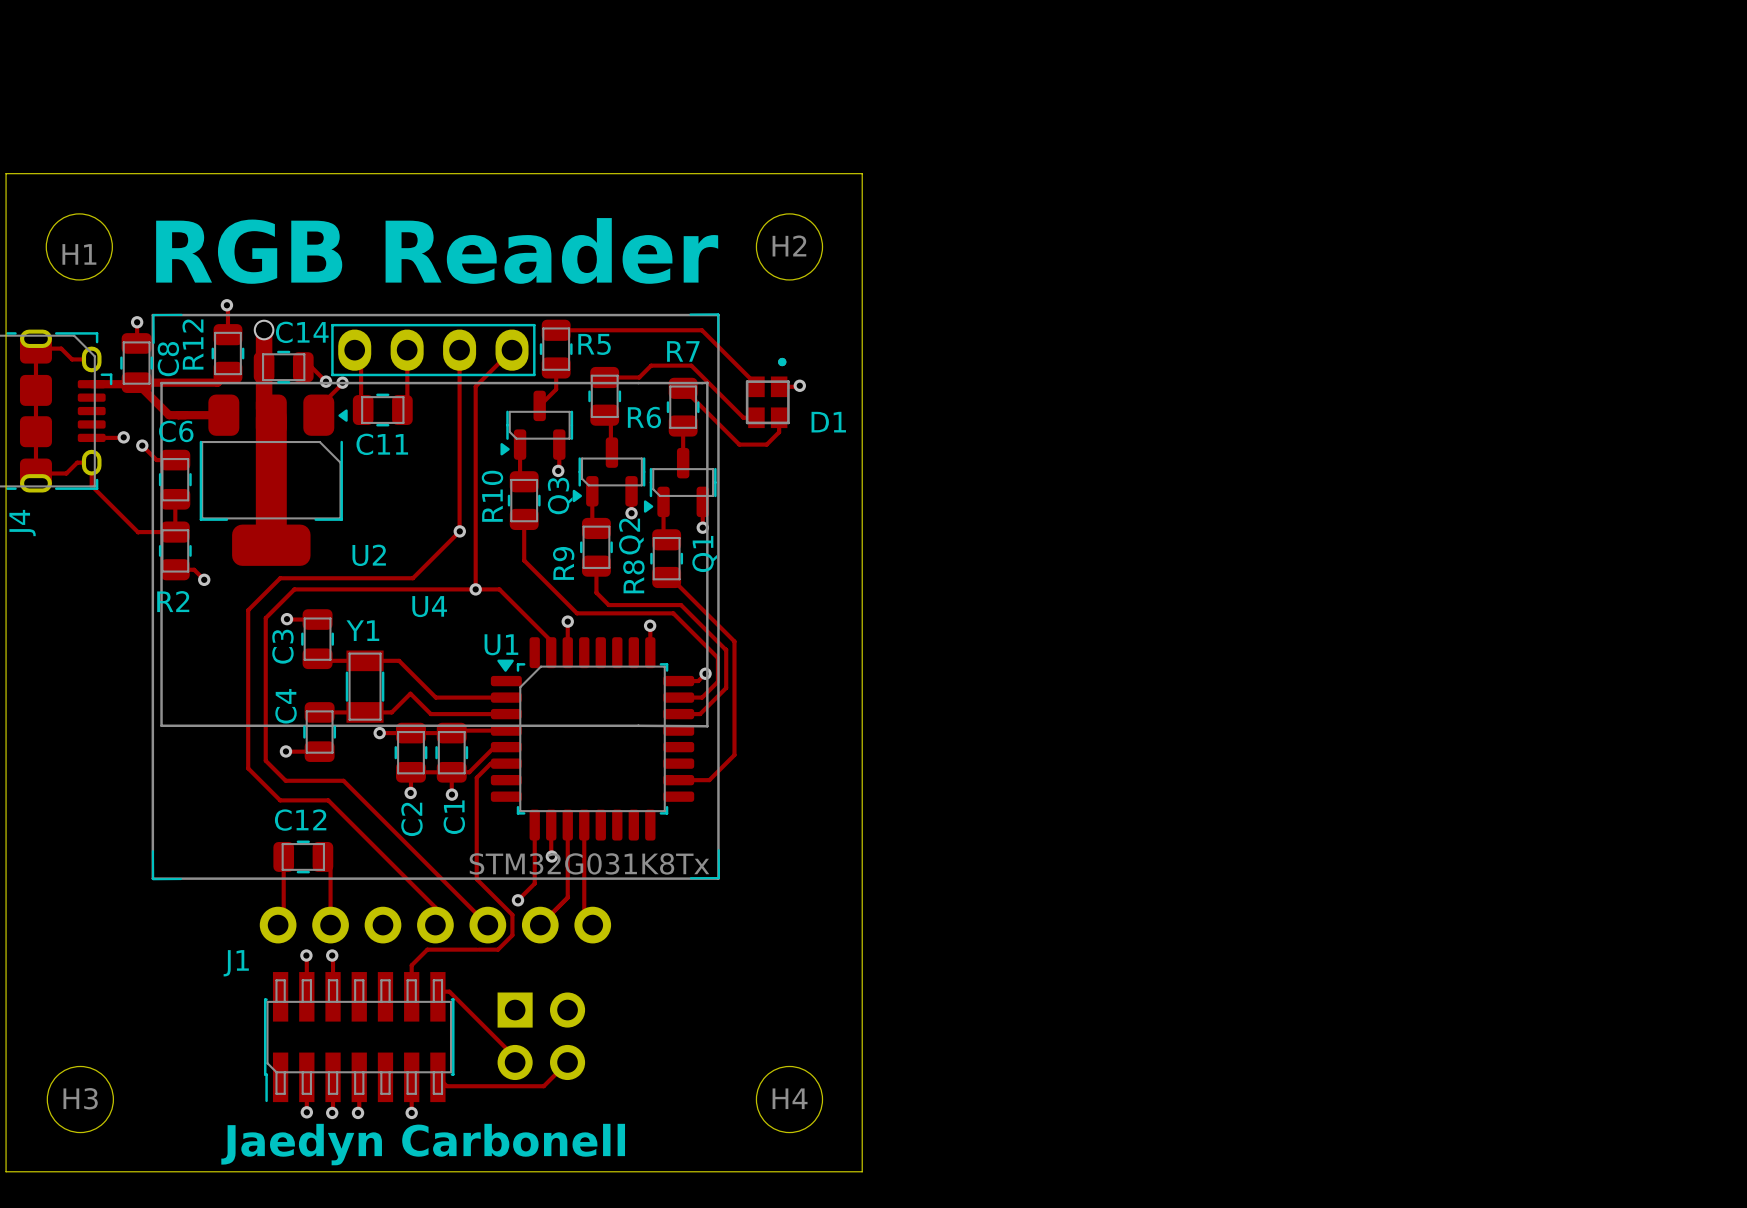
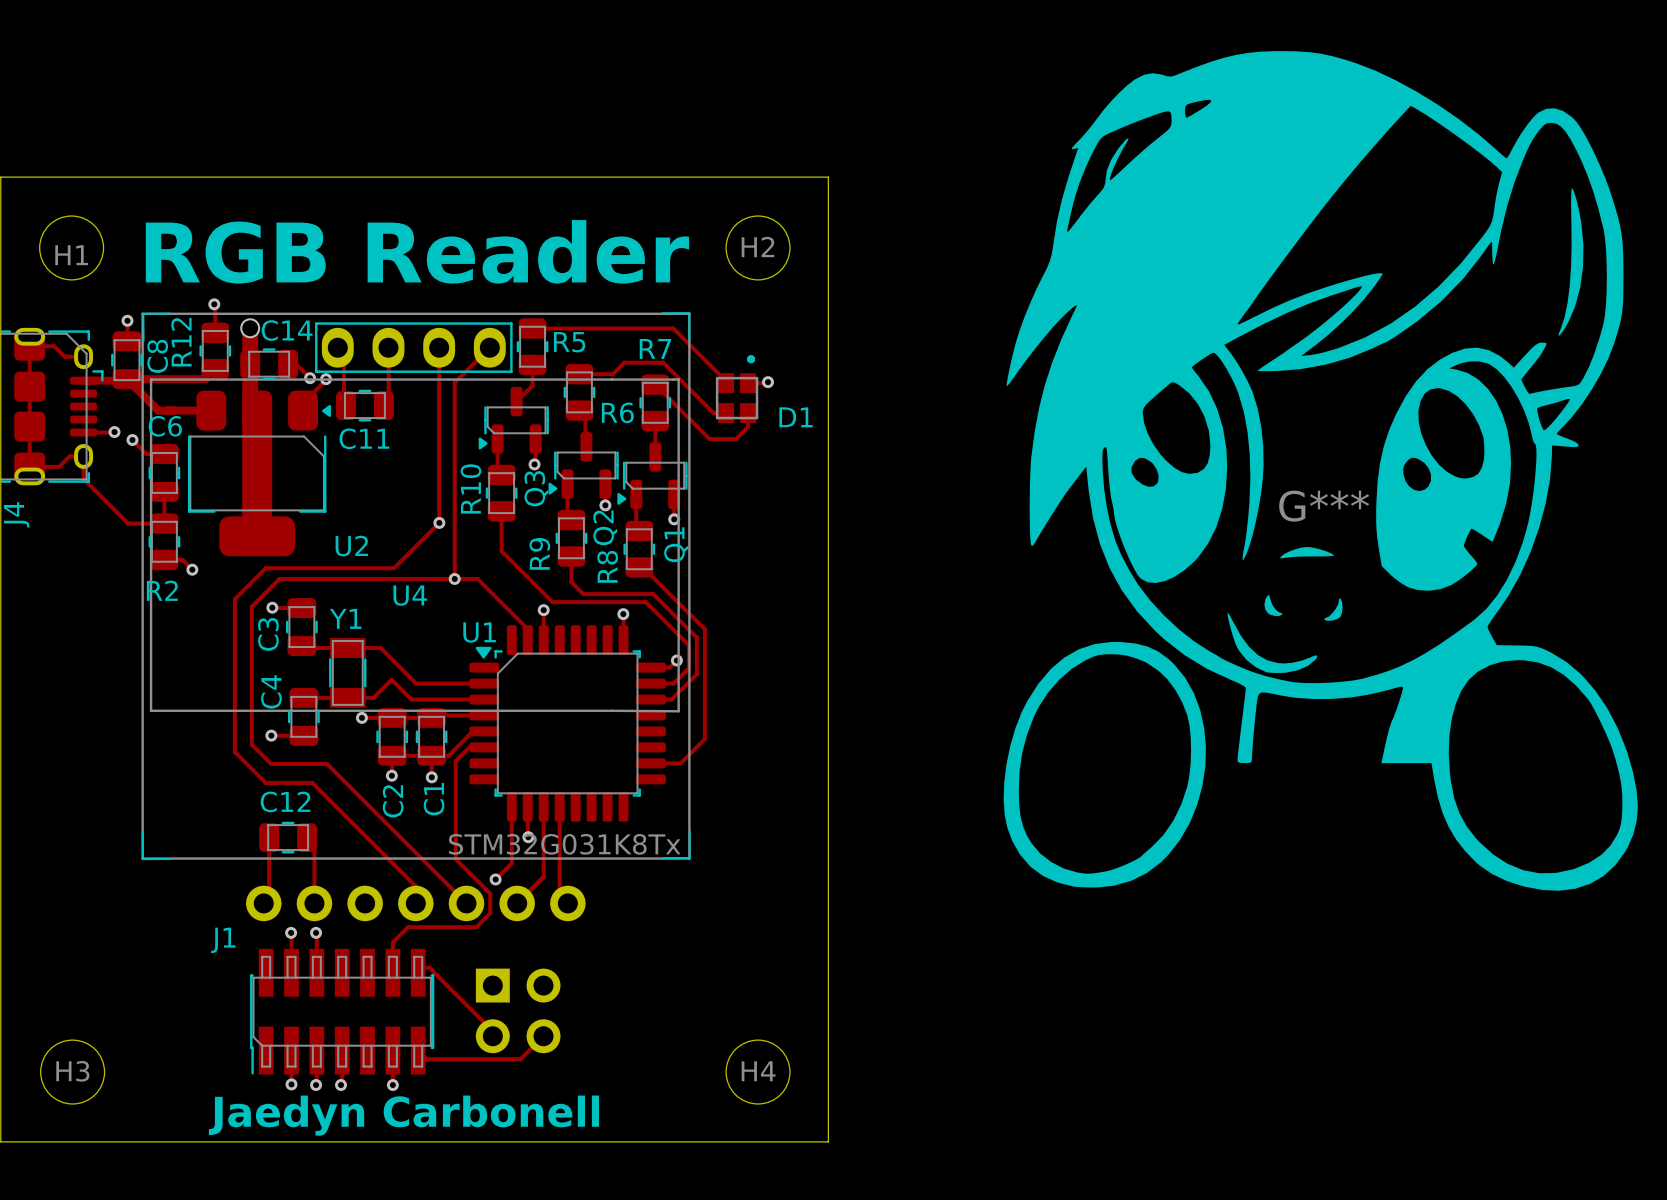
G***: none -> (1320, 470)

